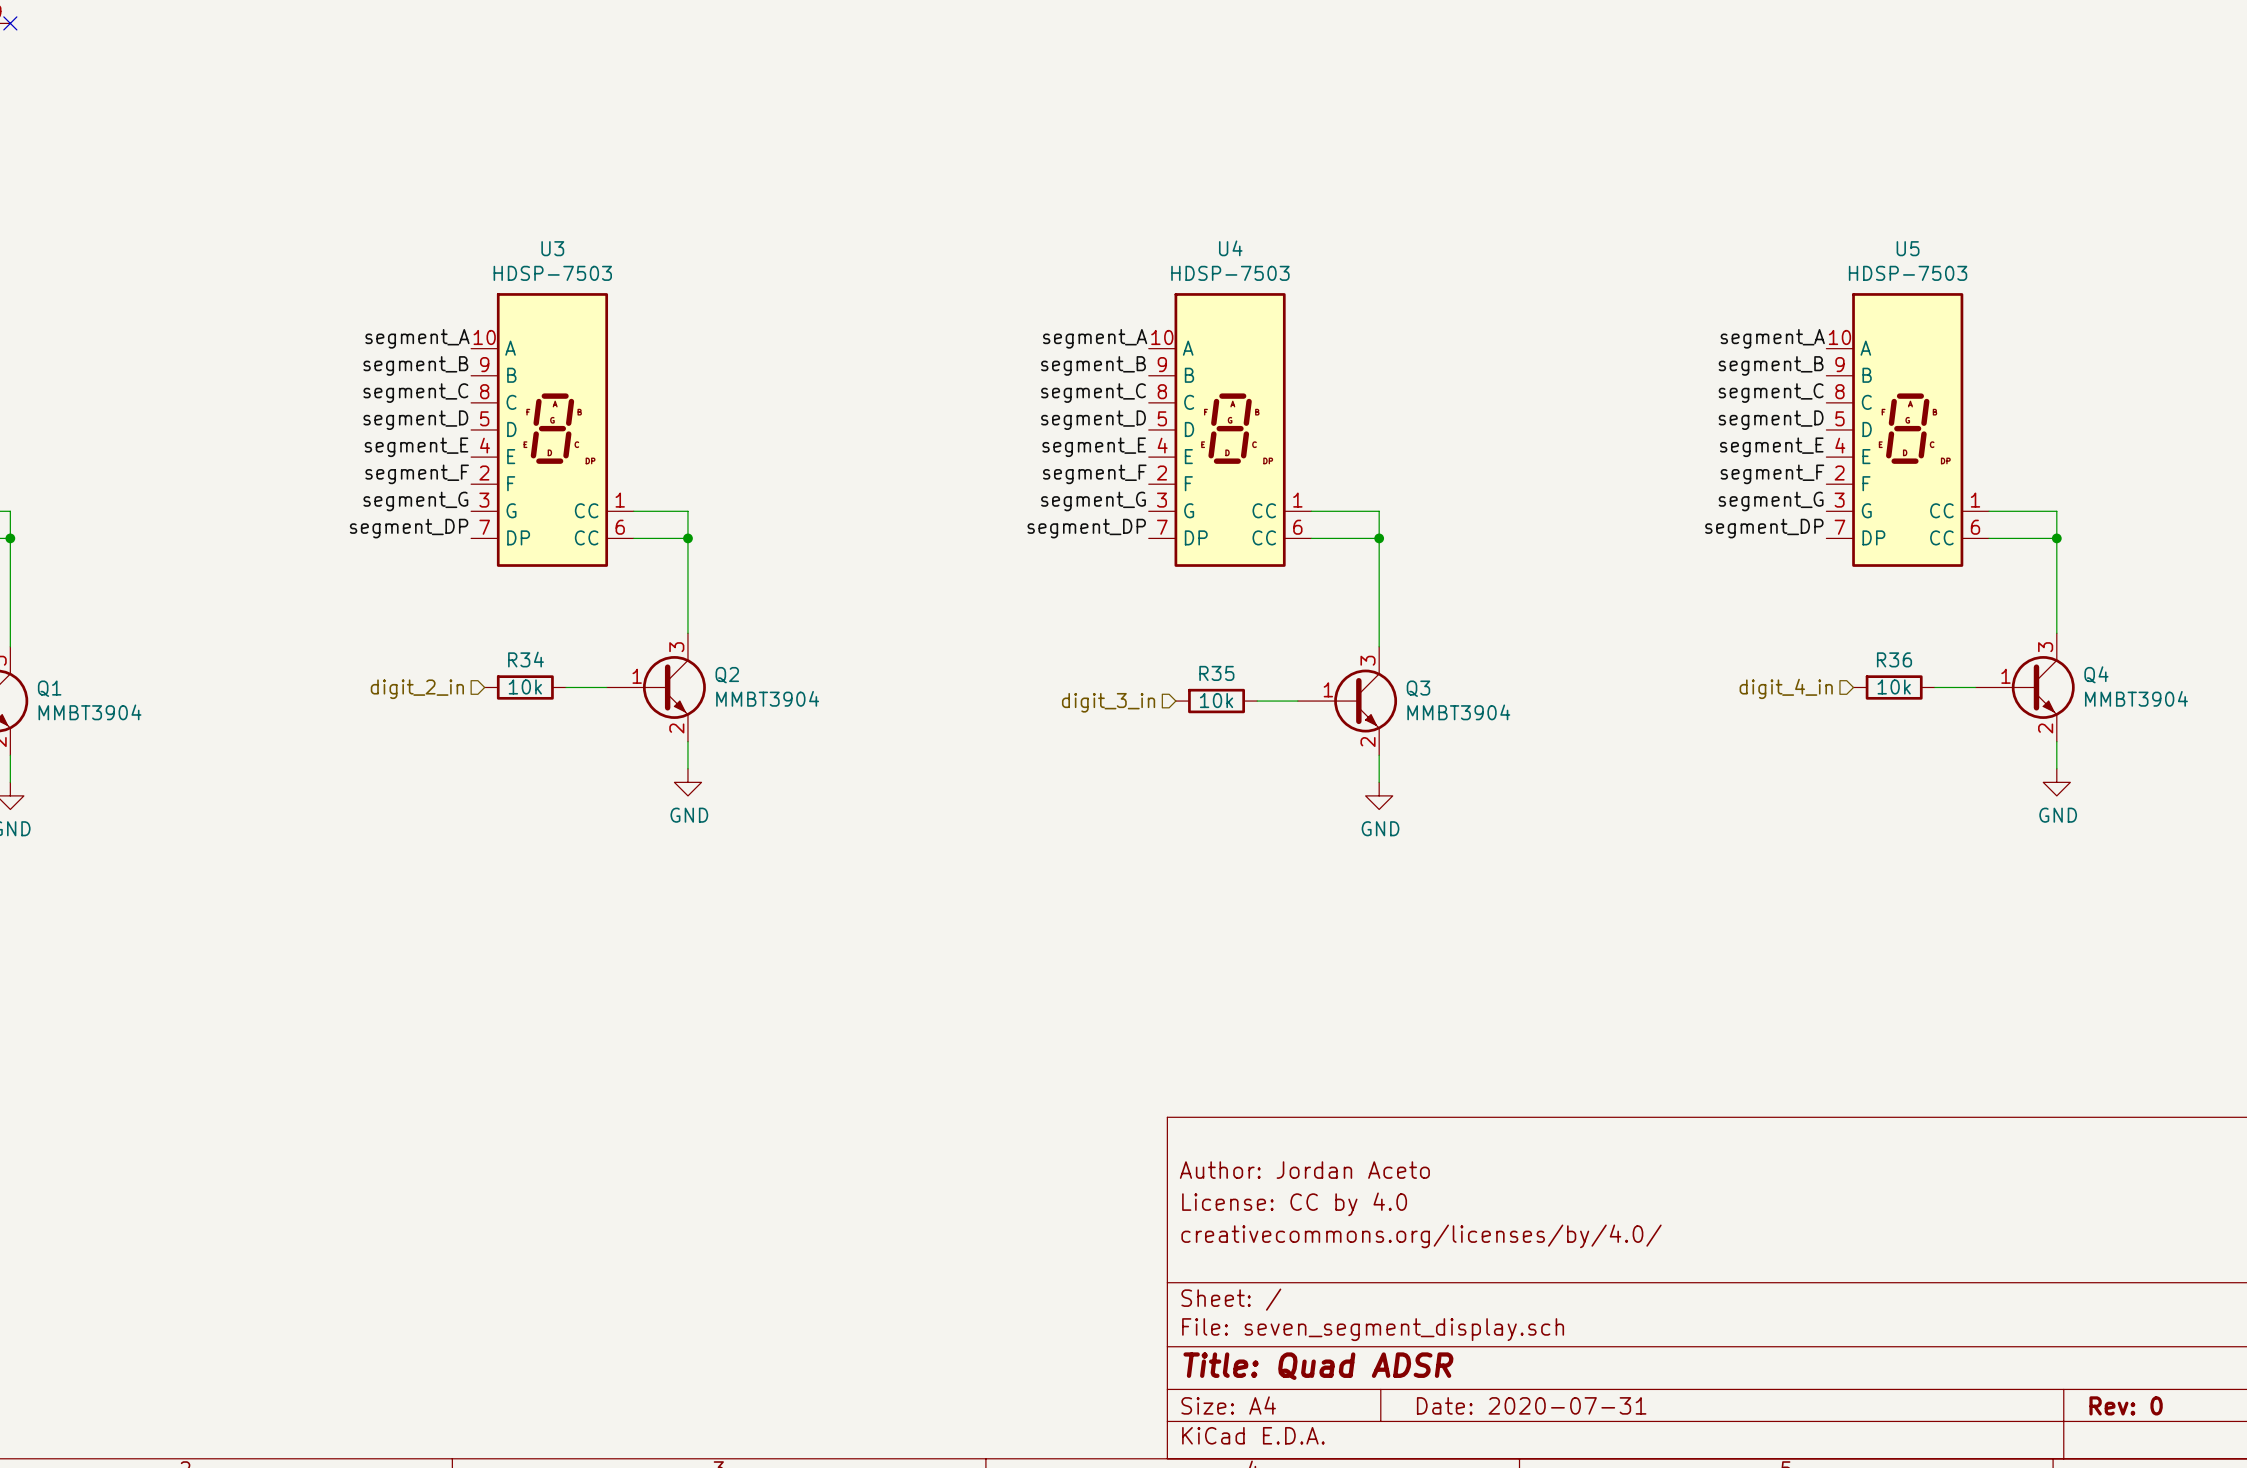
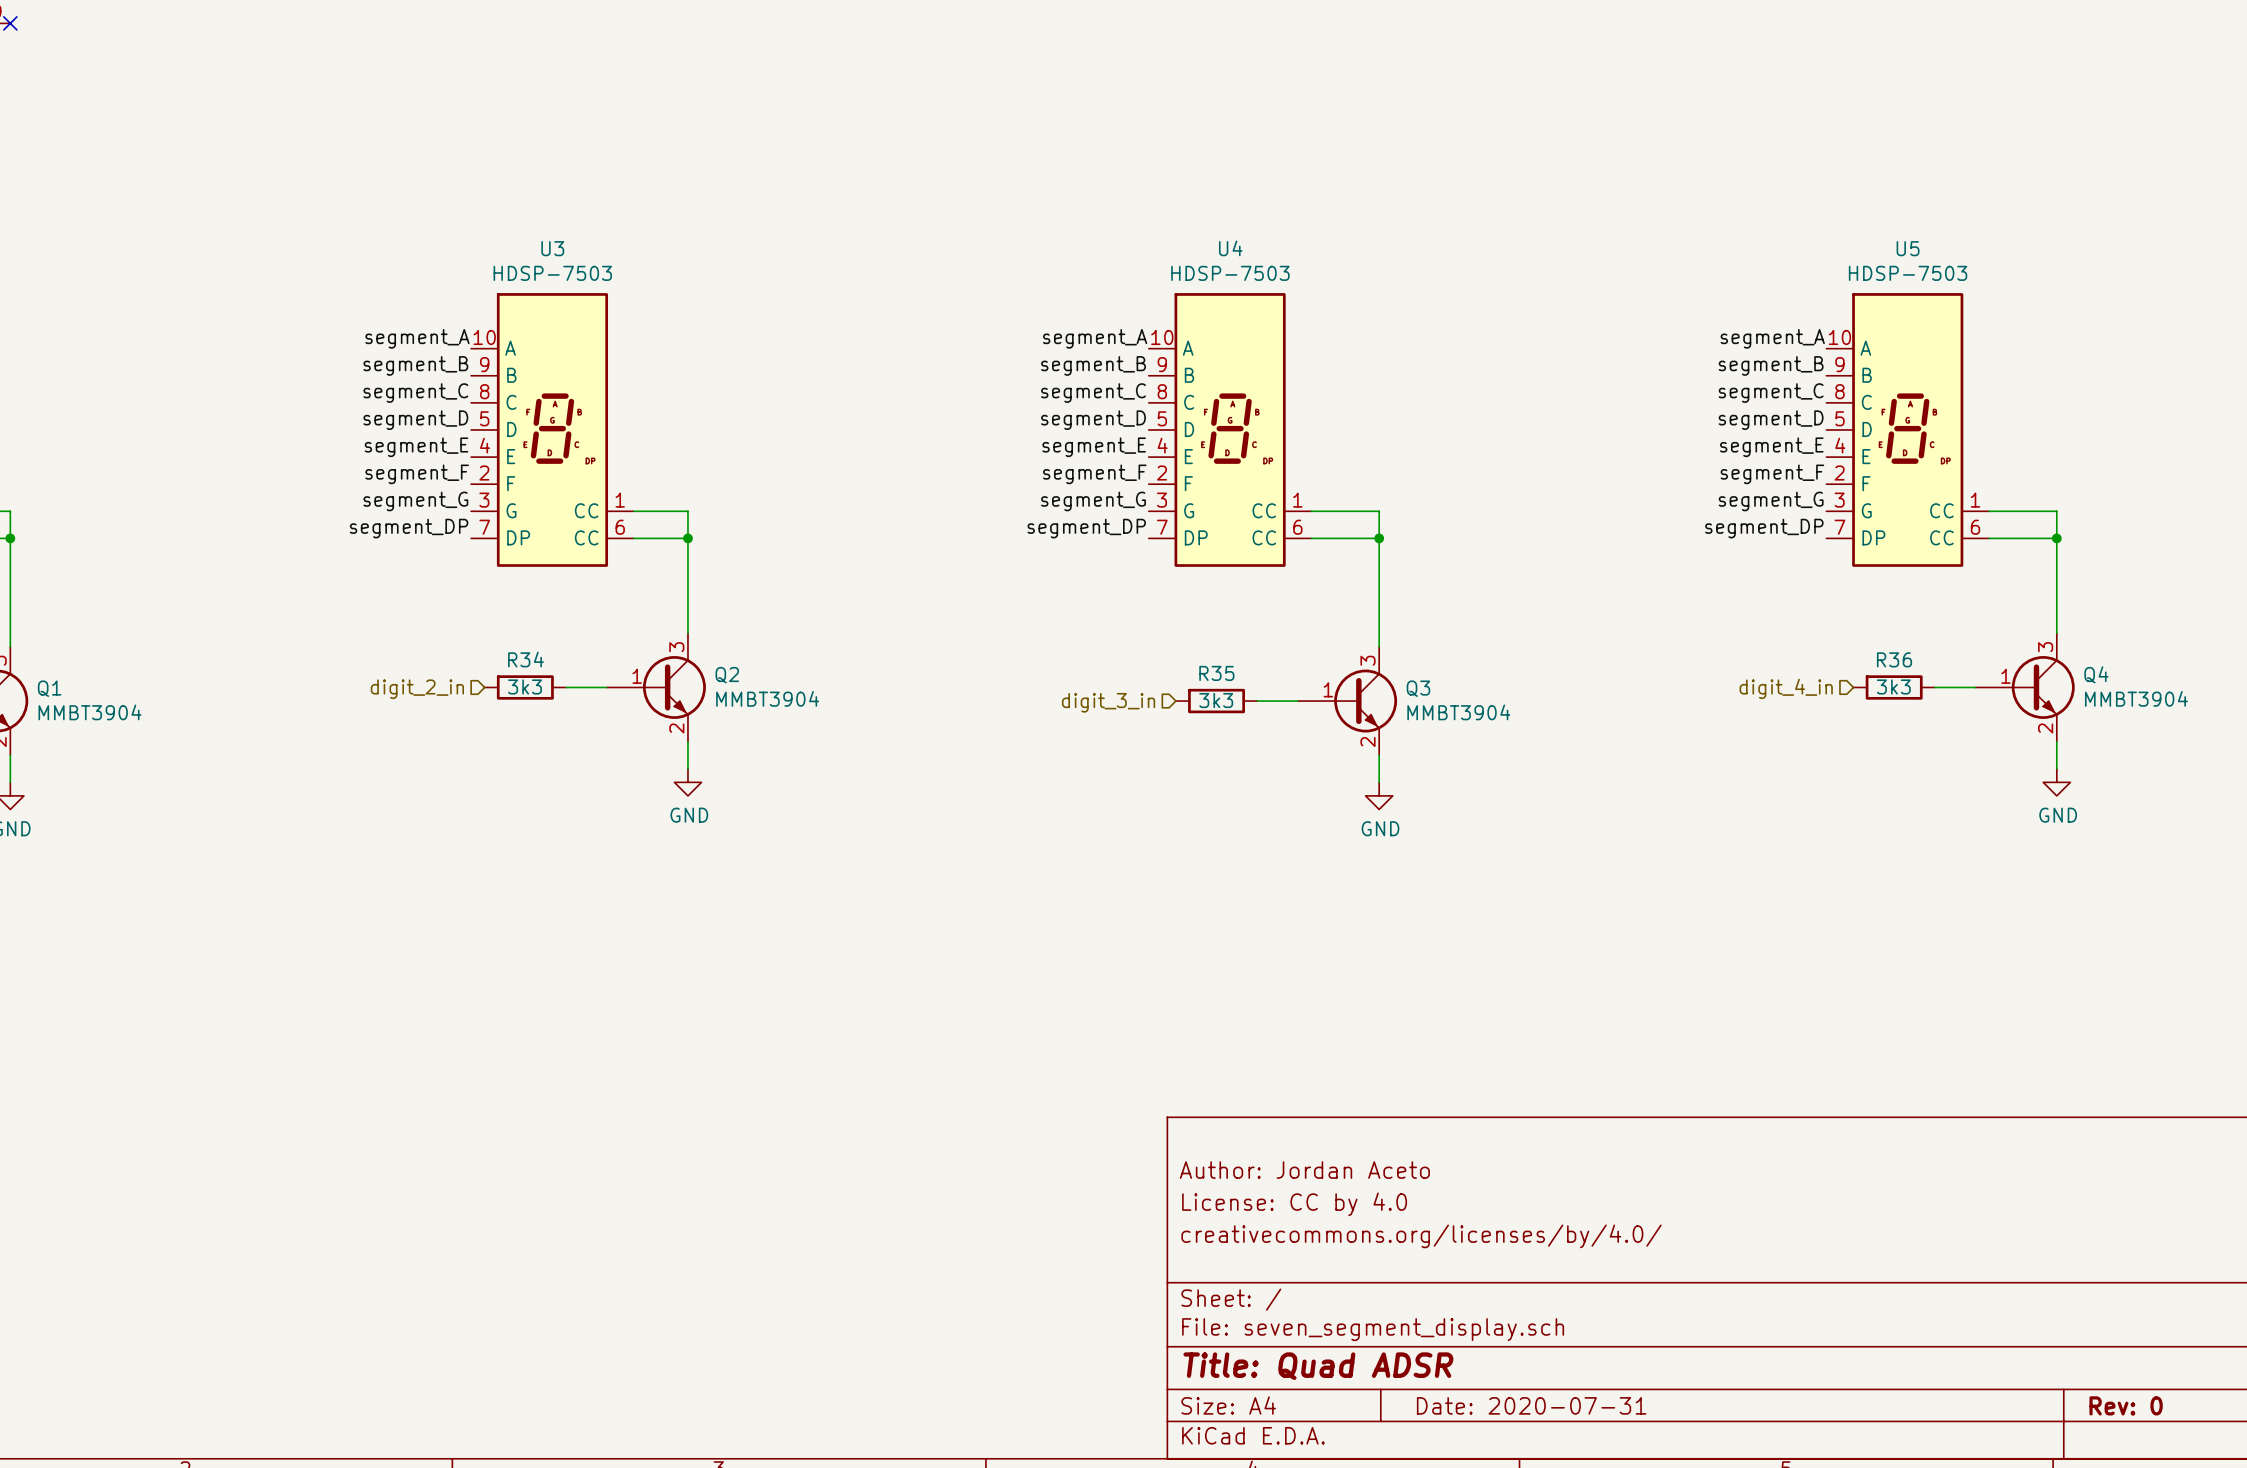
R34 value: 10k (525, 686) -> 3k3 (525, 686)
R36 value: 10k (1894, 686) -> 3k3 (1893, 686)
R35 value: 10k (1216, 700) -> 3k3 (1216, 700)

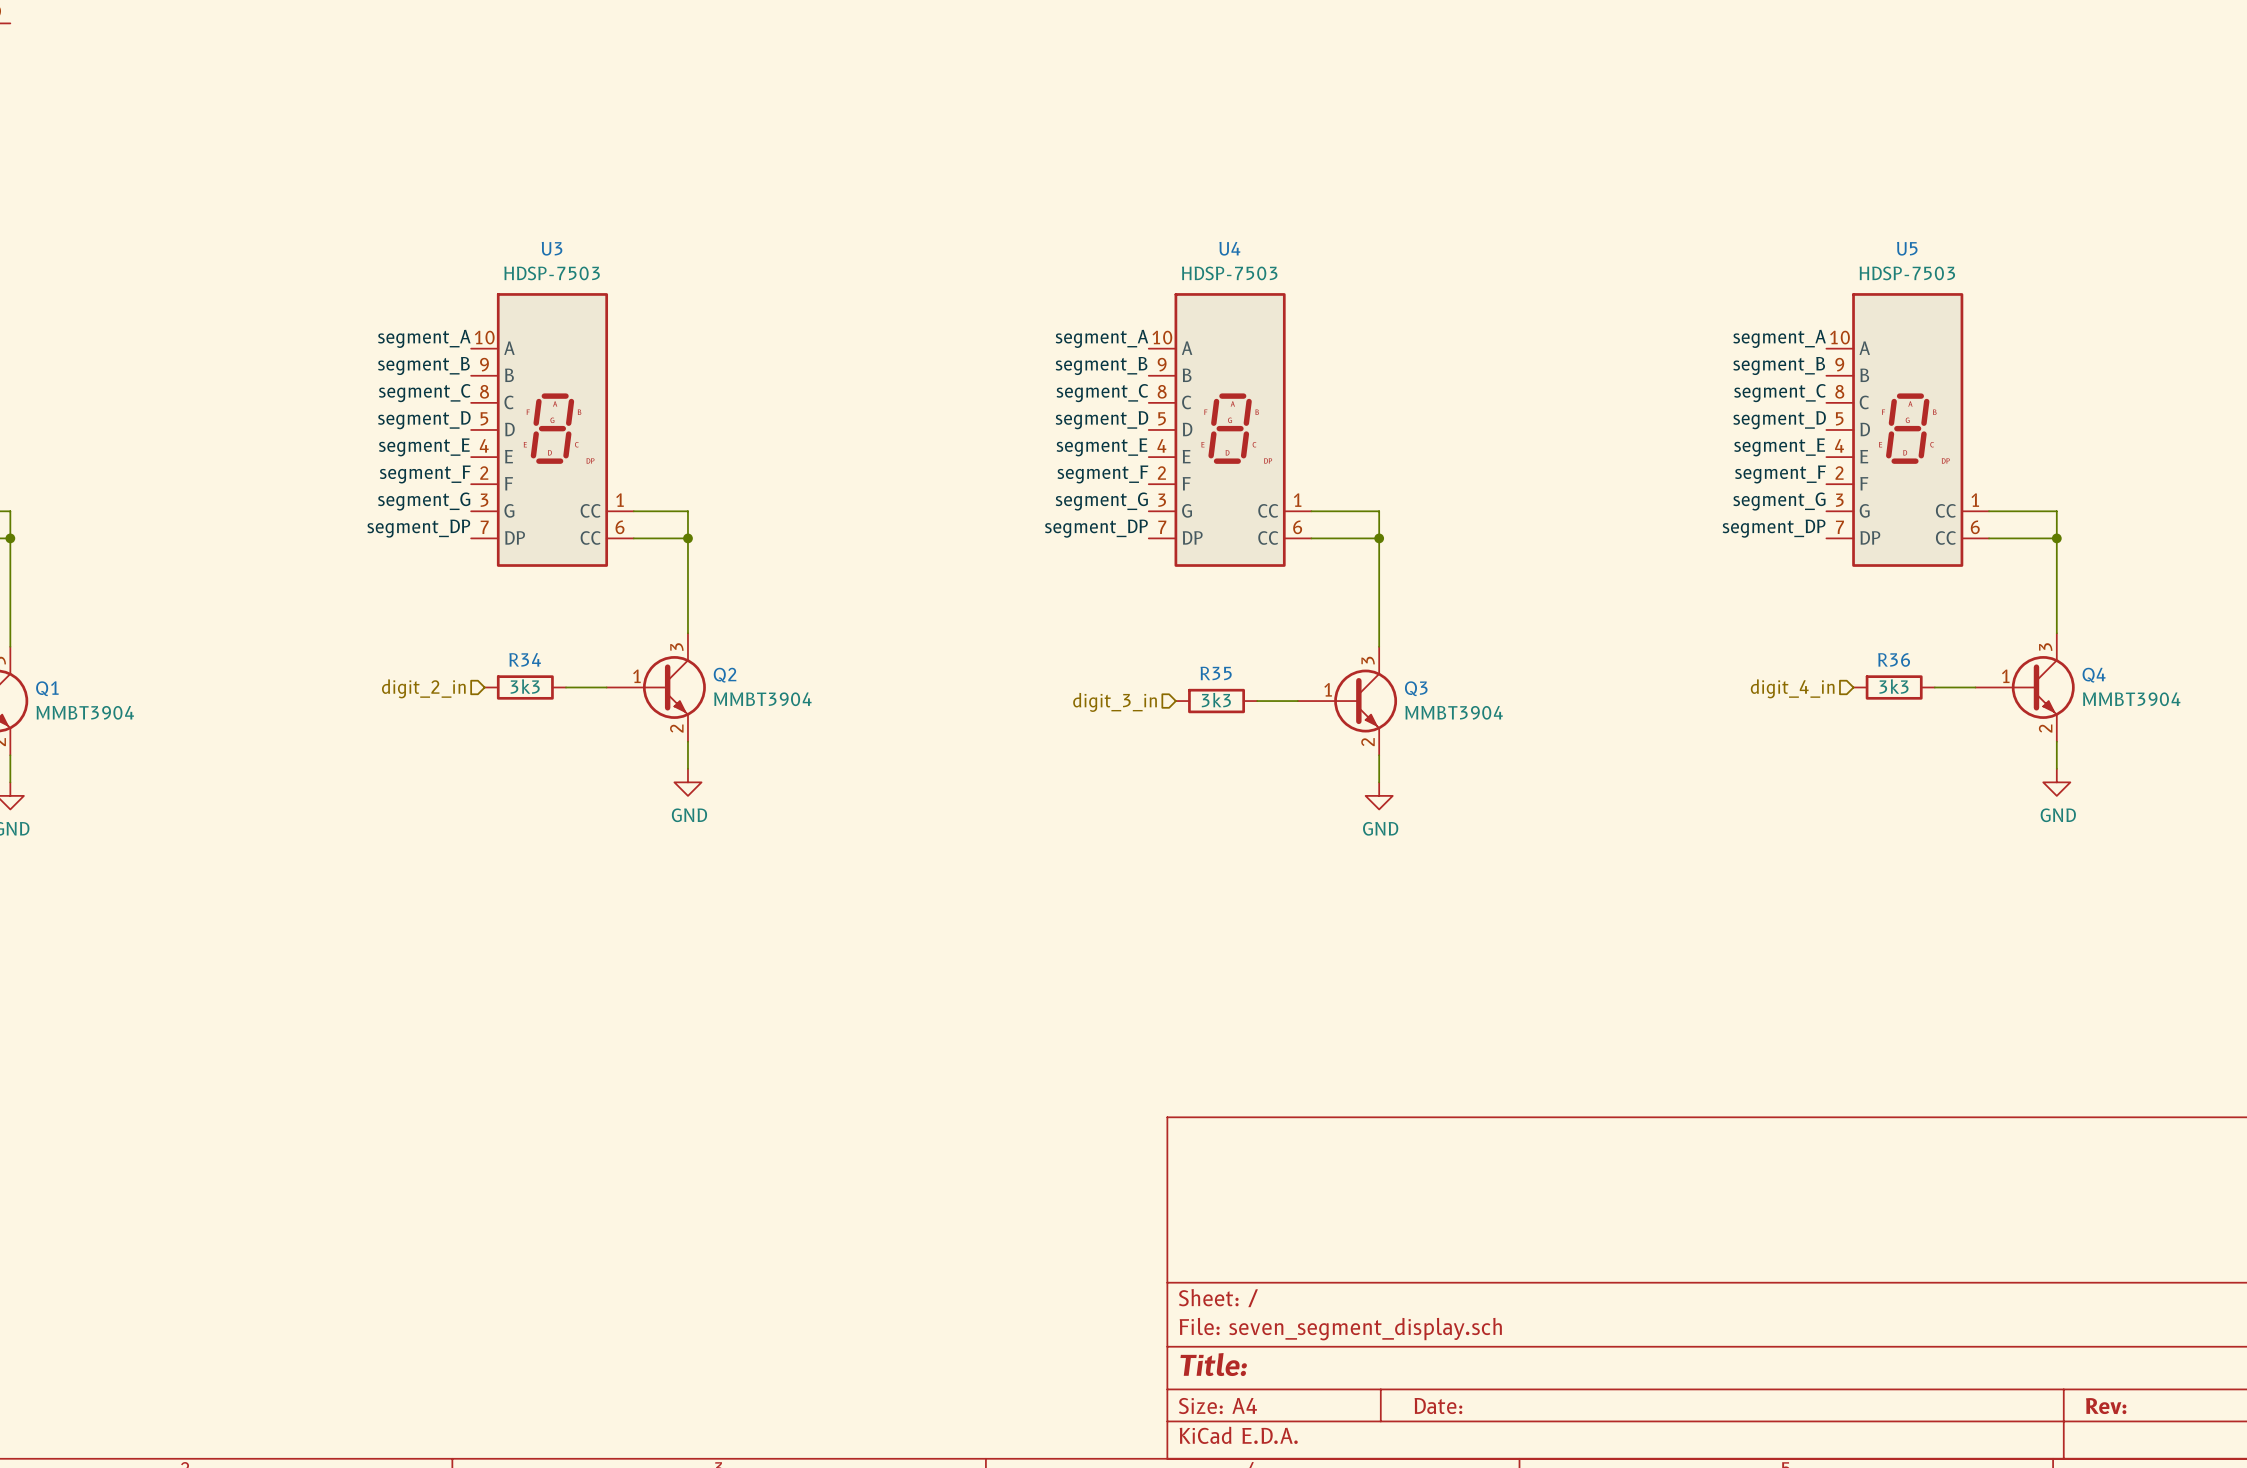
no-connect mark: (10, 23) -> none
title block: Author: Jordan Aceto (1304, 1170) -> none
title block: License: CC by 4.0 (1294, 1204) -> none
title block: creativecommons.org/licenses/by/4.0/ (1421, 1236) -> none
title block: Title: Quad ADSR (1318, 1366) -> Title: (1213, 1364)
title block: Date: 2020-07-31 (1531, 1405) -> Date: (1438, 1406)
title block: Rev: 0 (2126, 1405) -> Rev: (2106, 1406)

